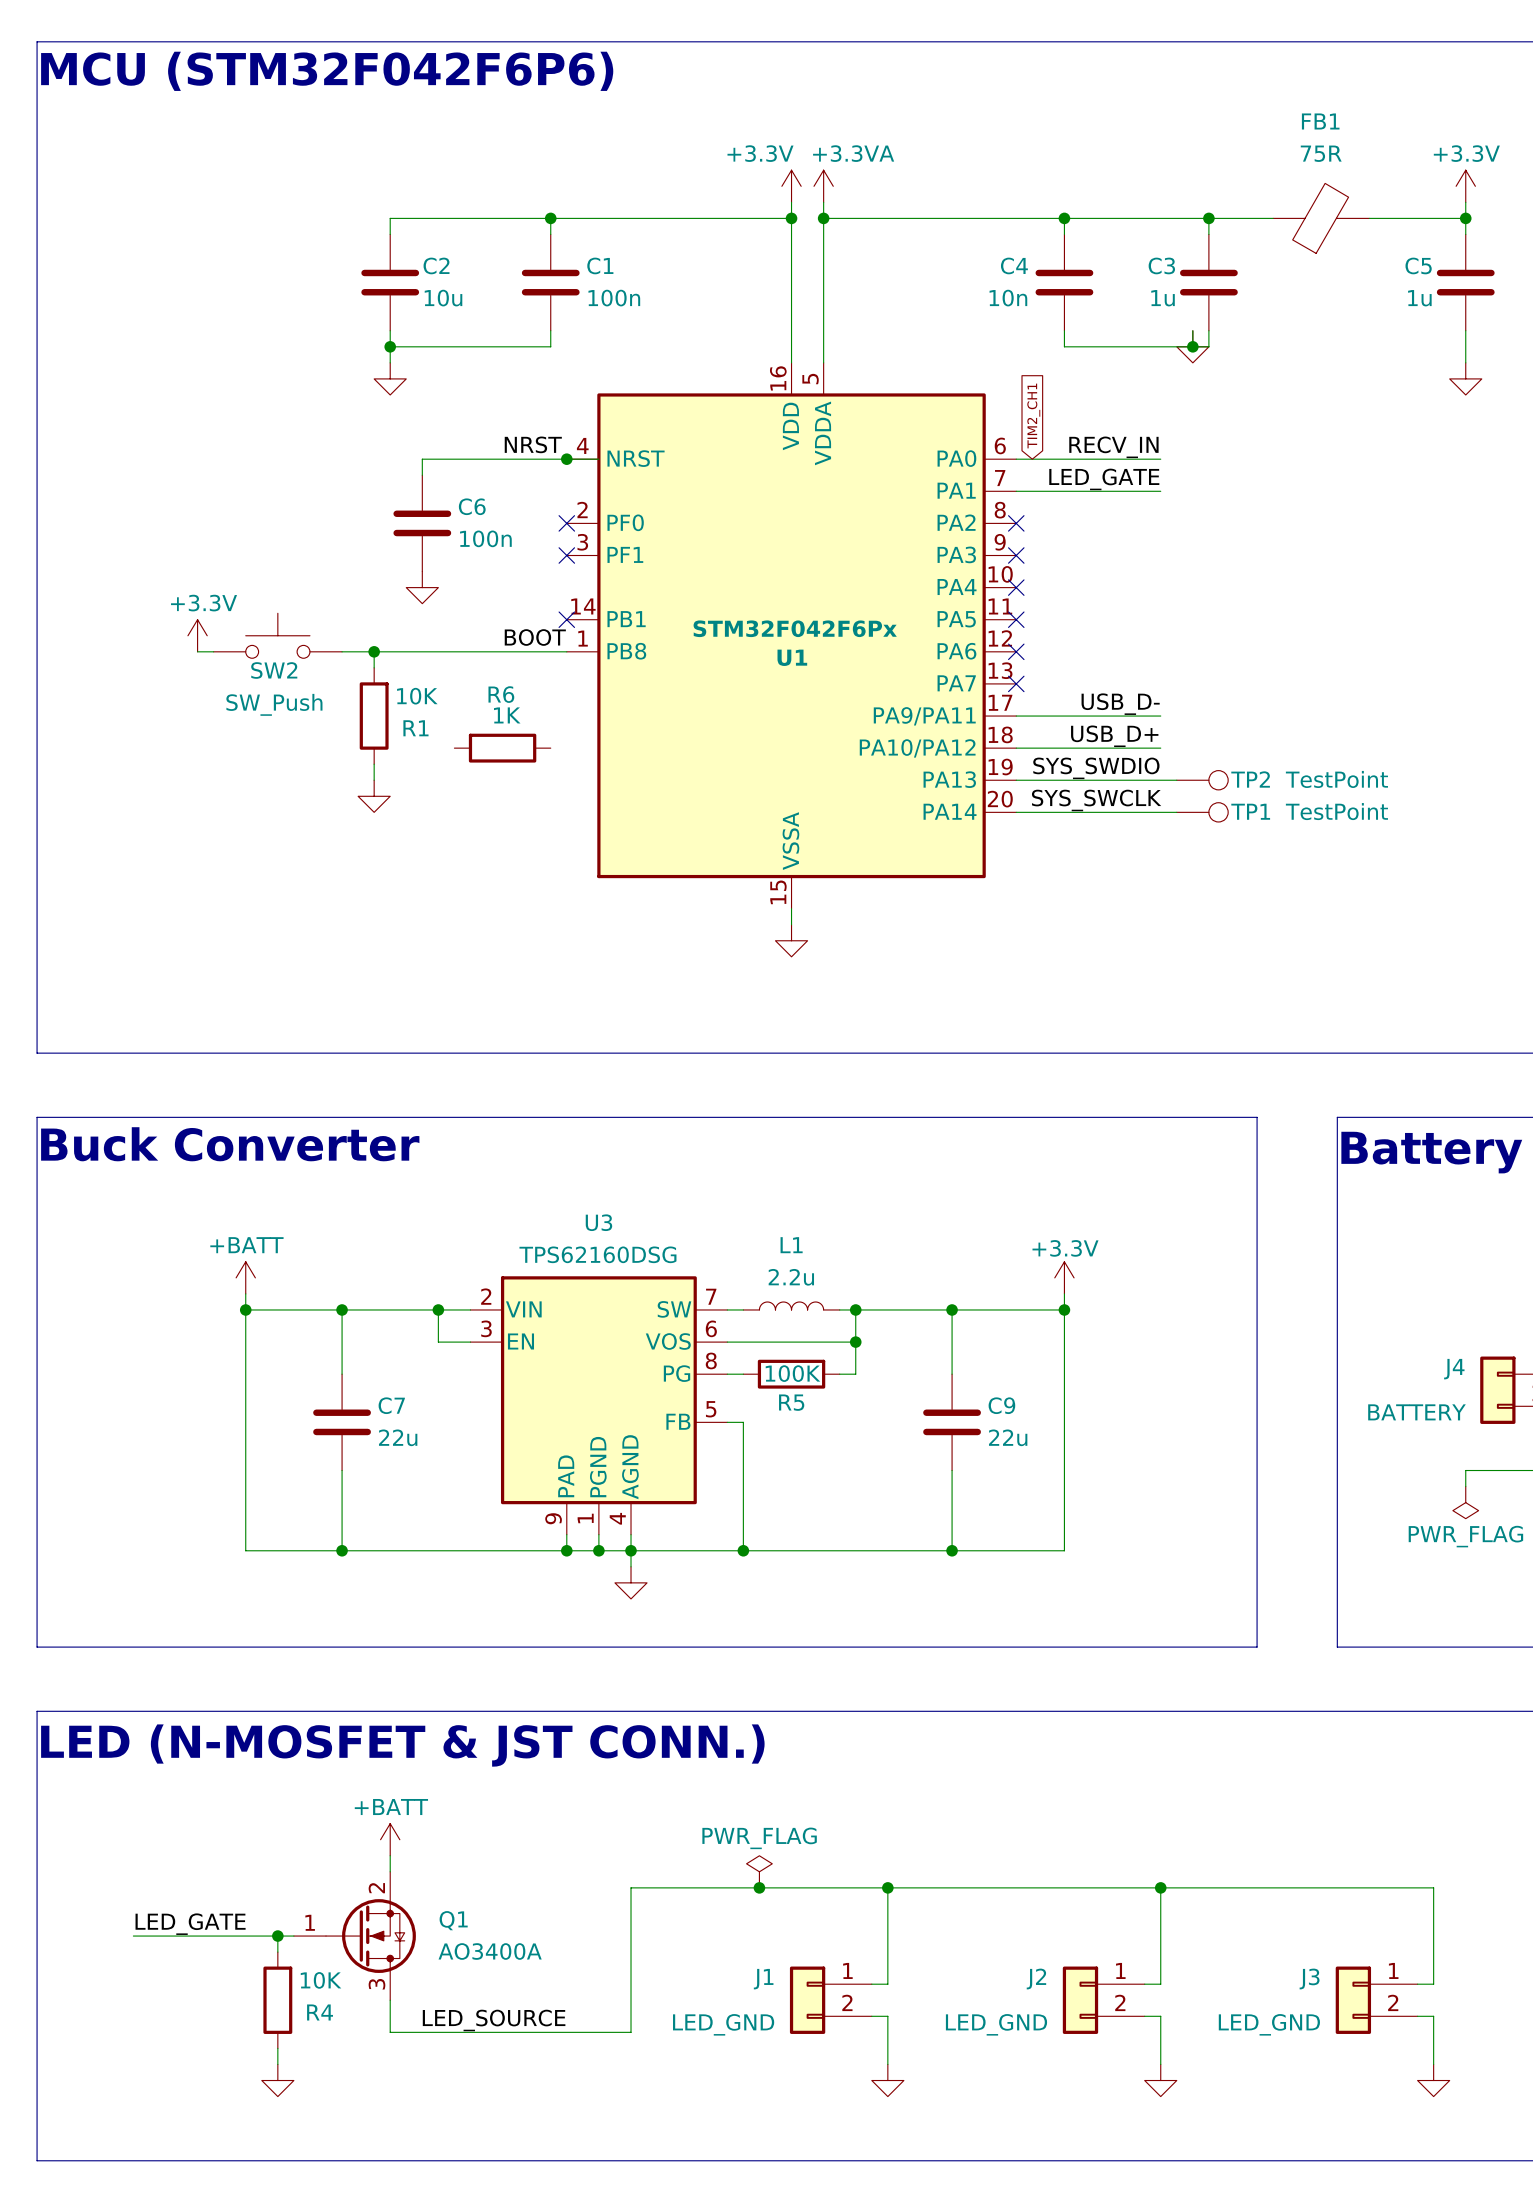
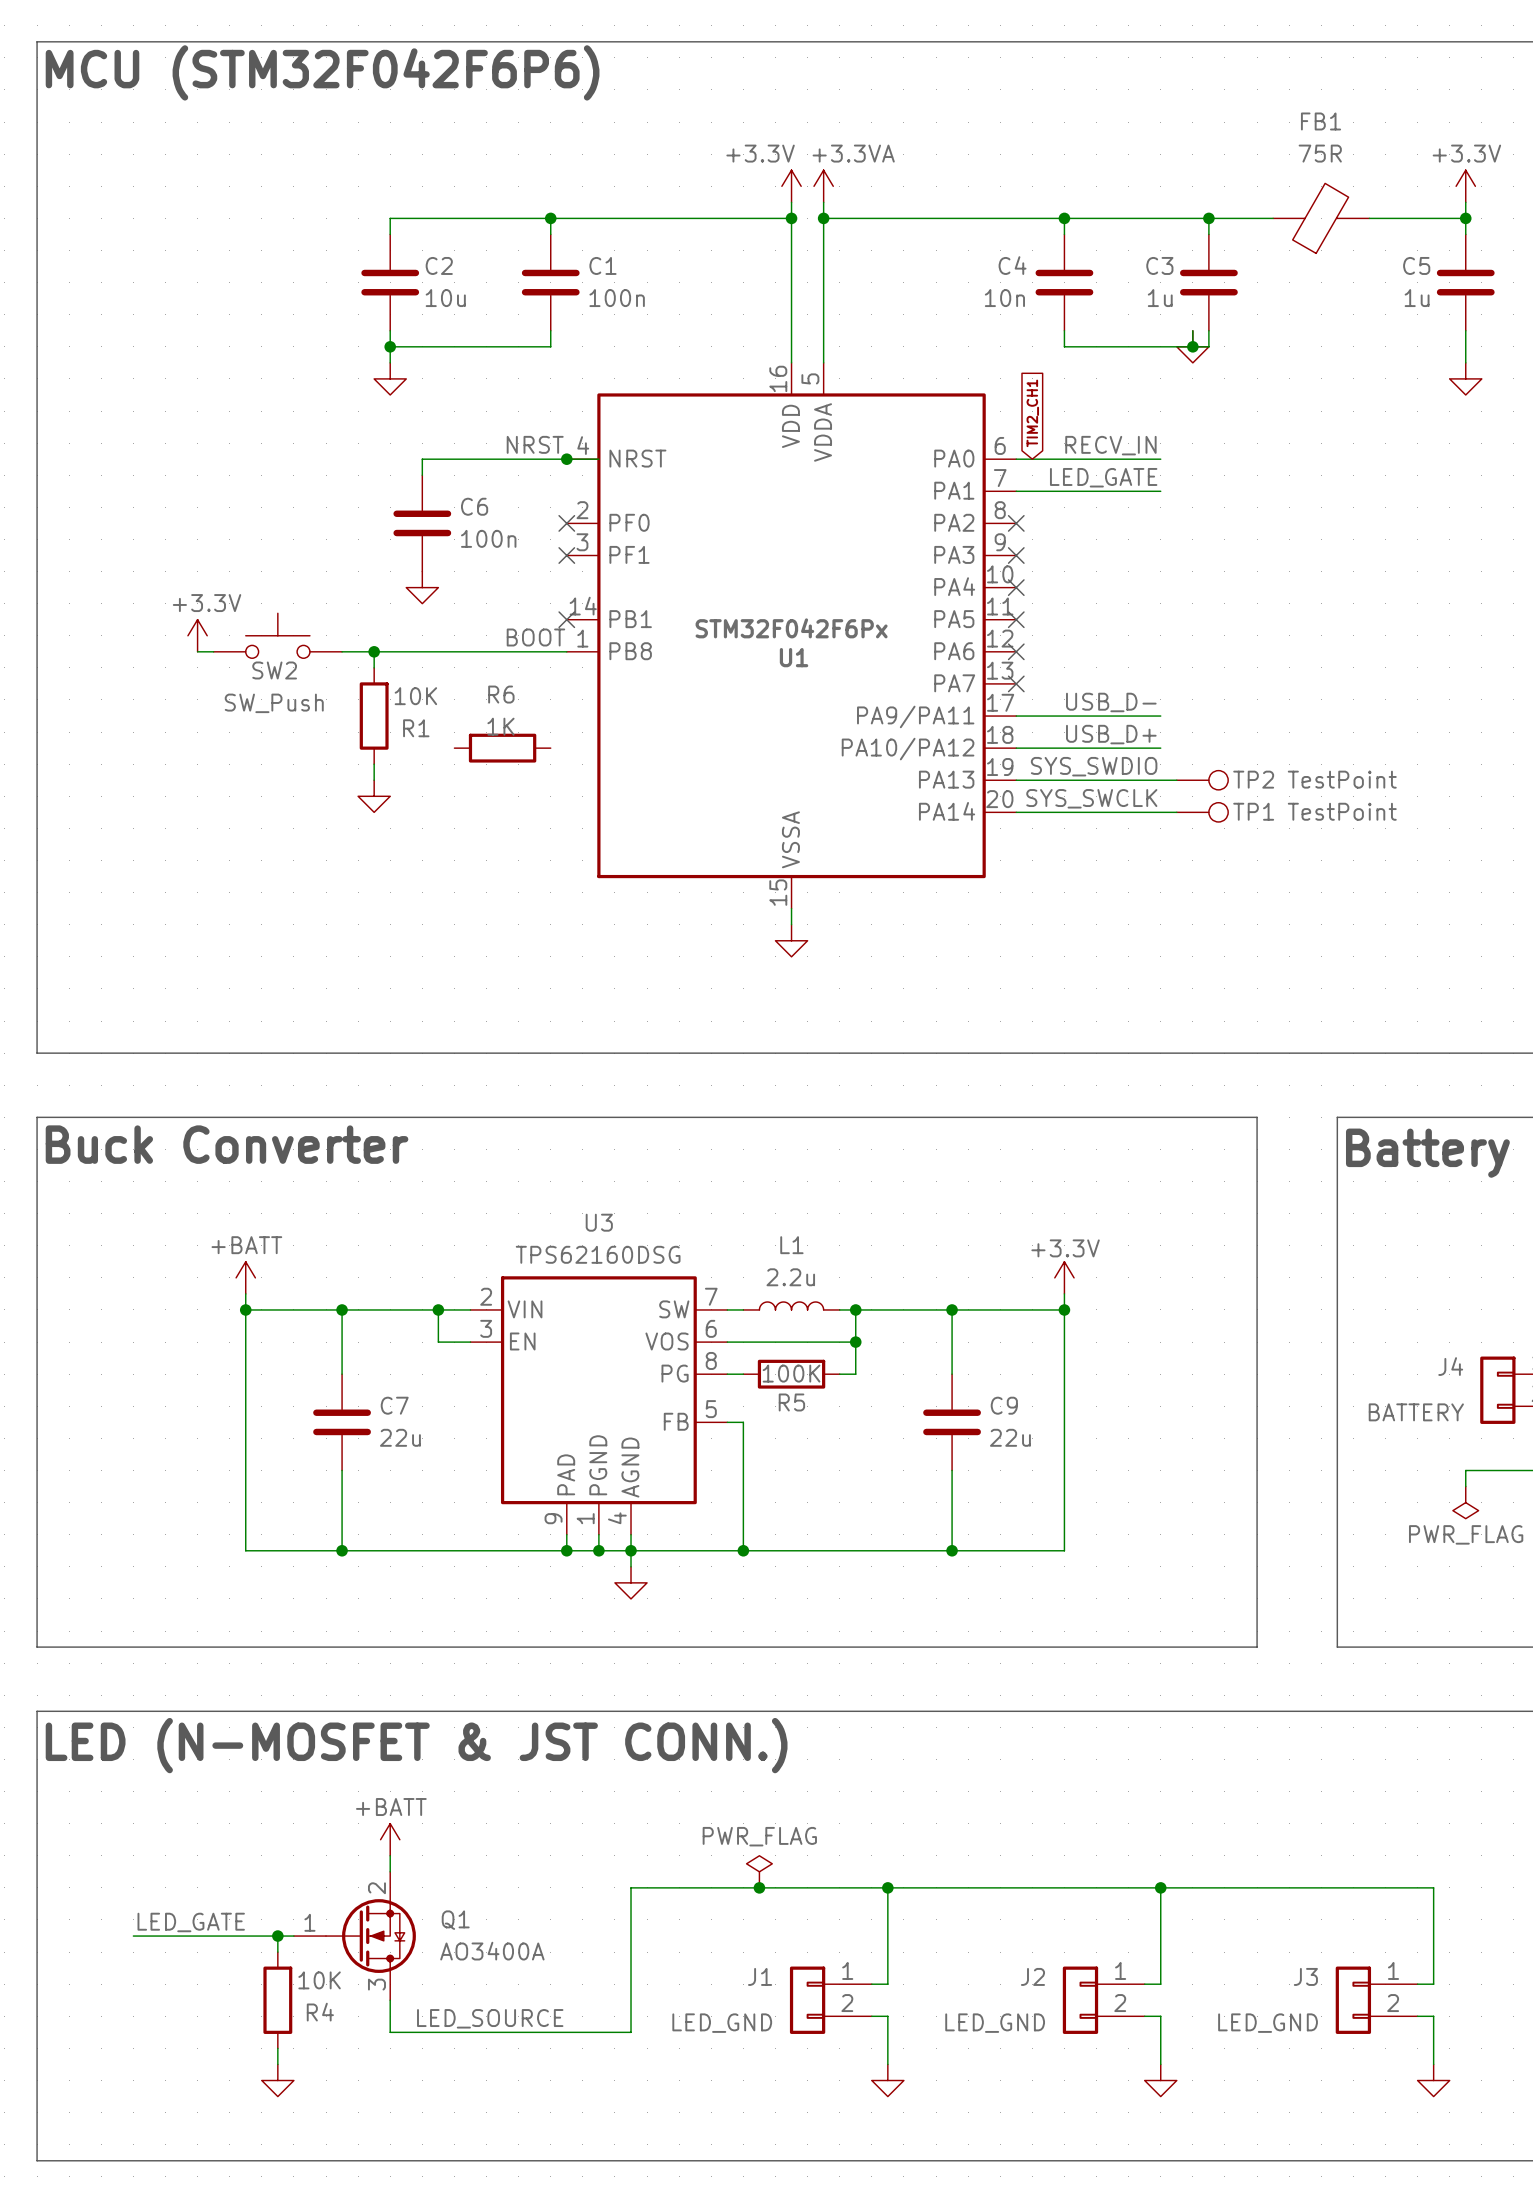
R6 value position: 1K (507, 715) -> 1K (500, 726)

